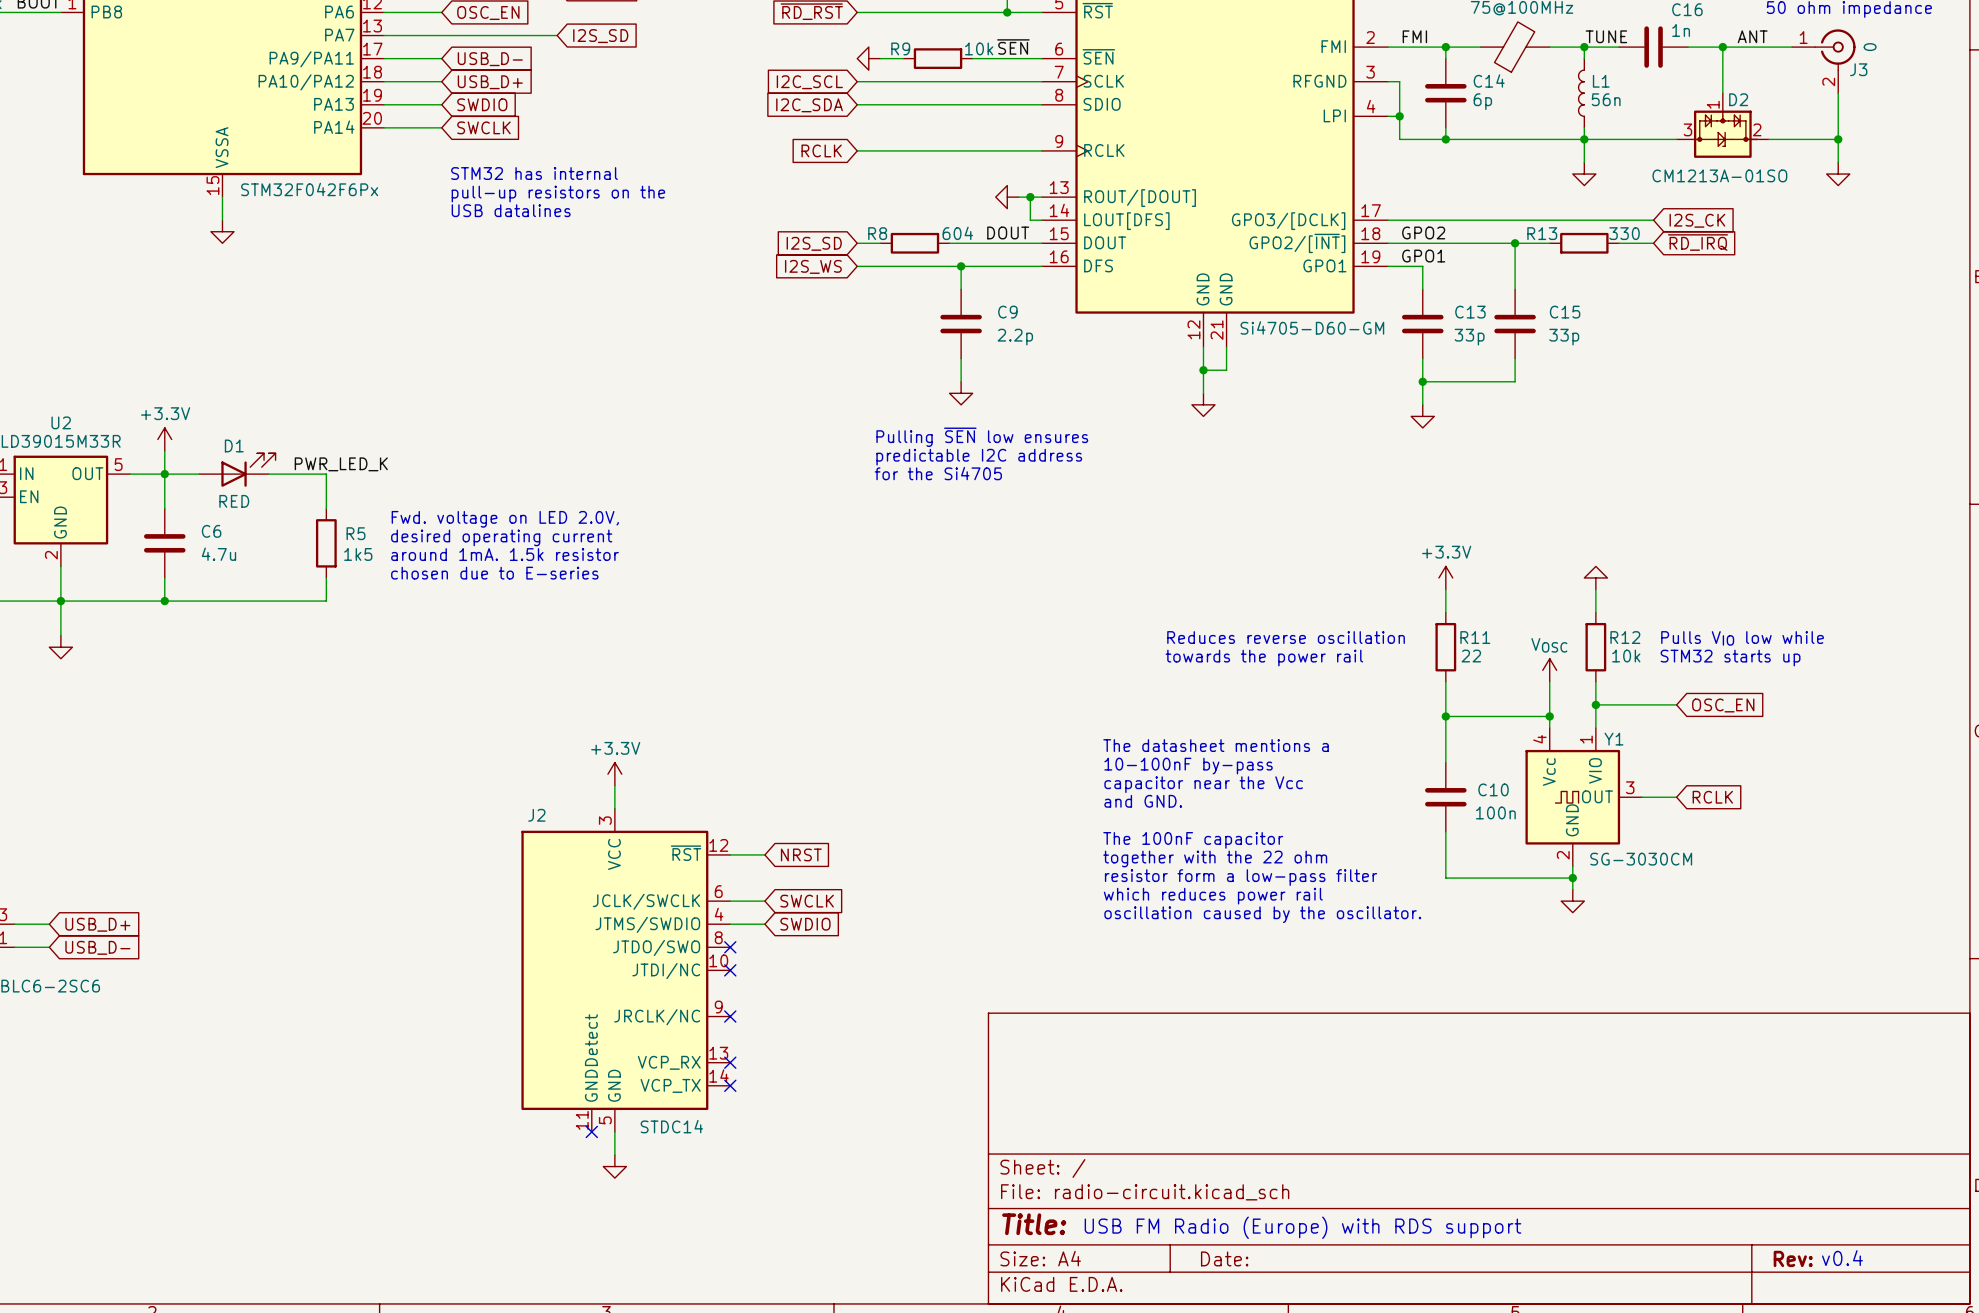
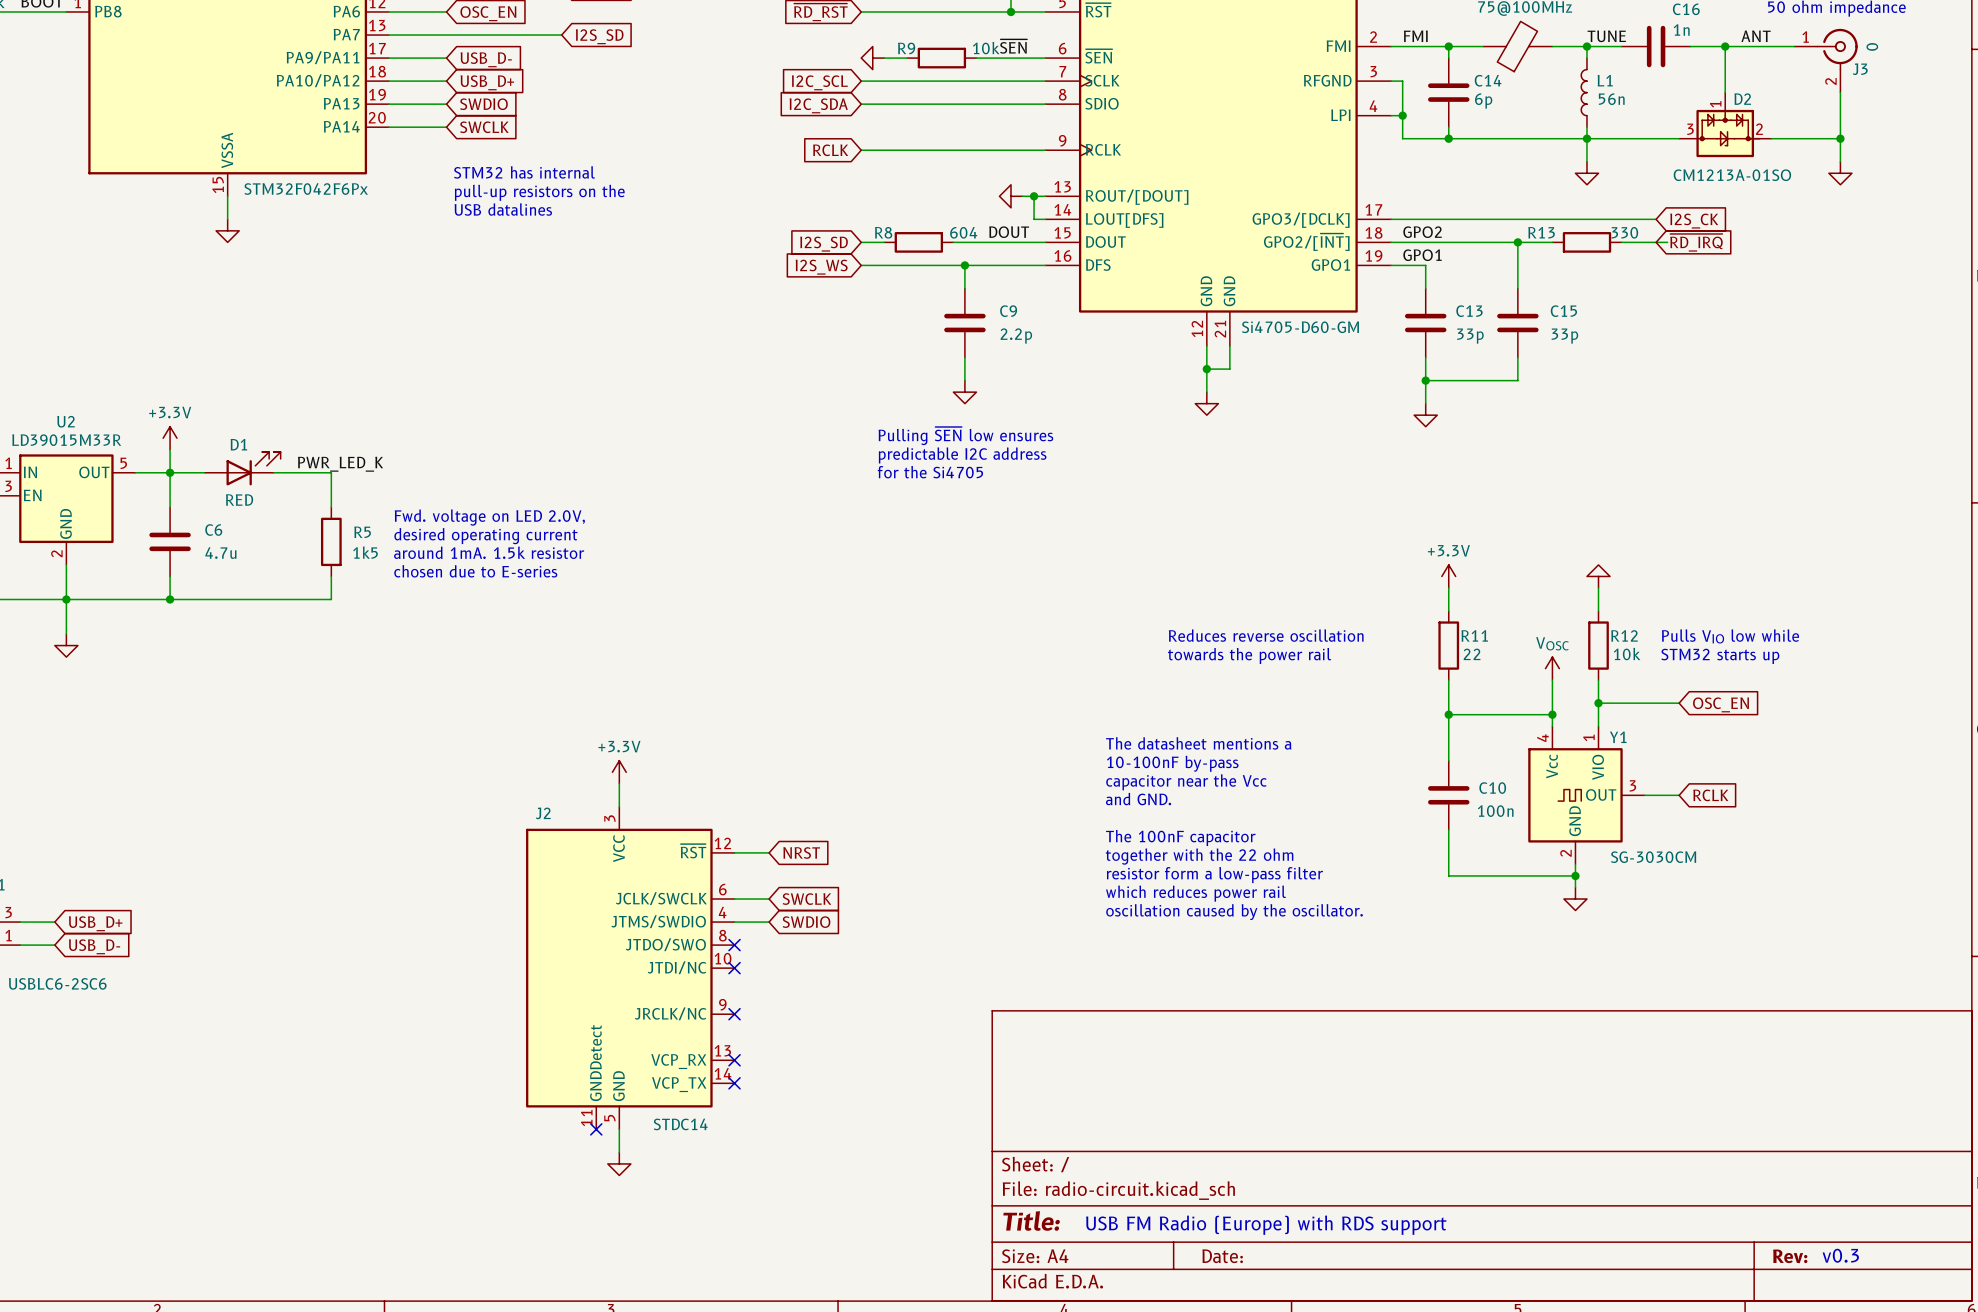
wire: none -> (1656, 242) (1667, 242)
text: v0.4 (1842, 1258) -> v0.3 (1840, 1255)

